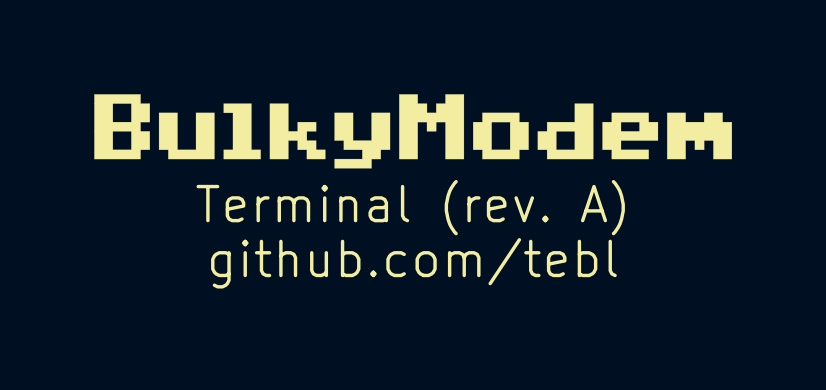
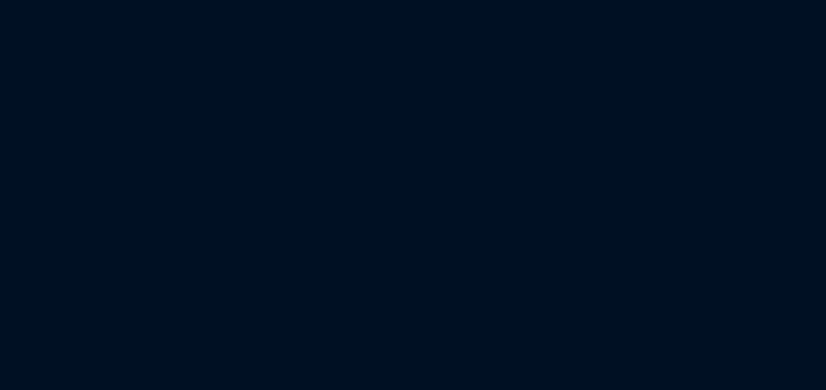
drawing: [94, 94, 732, 169] -> none
text: Terminal (rev. A) (410, 207) -> none
text: github.com/tebl (413, 263) -> none

